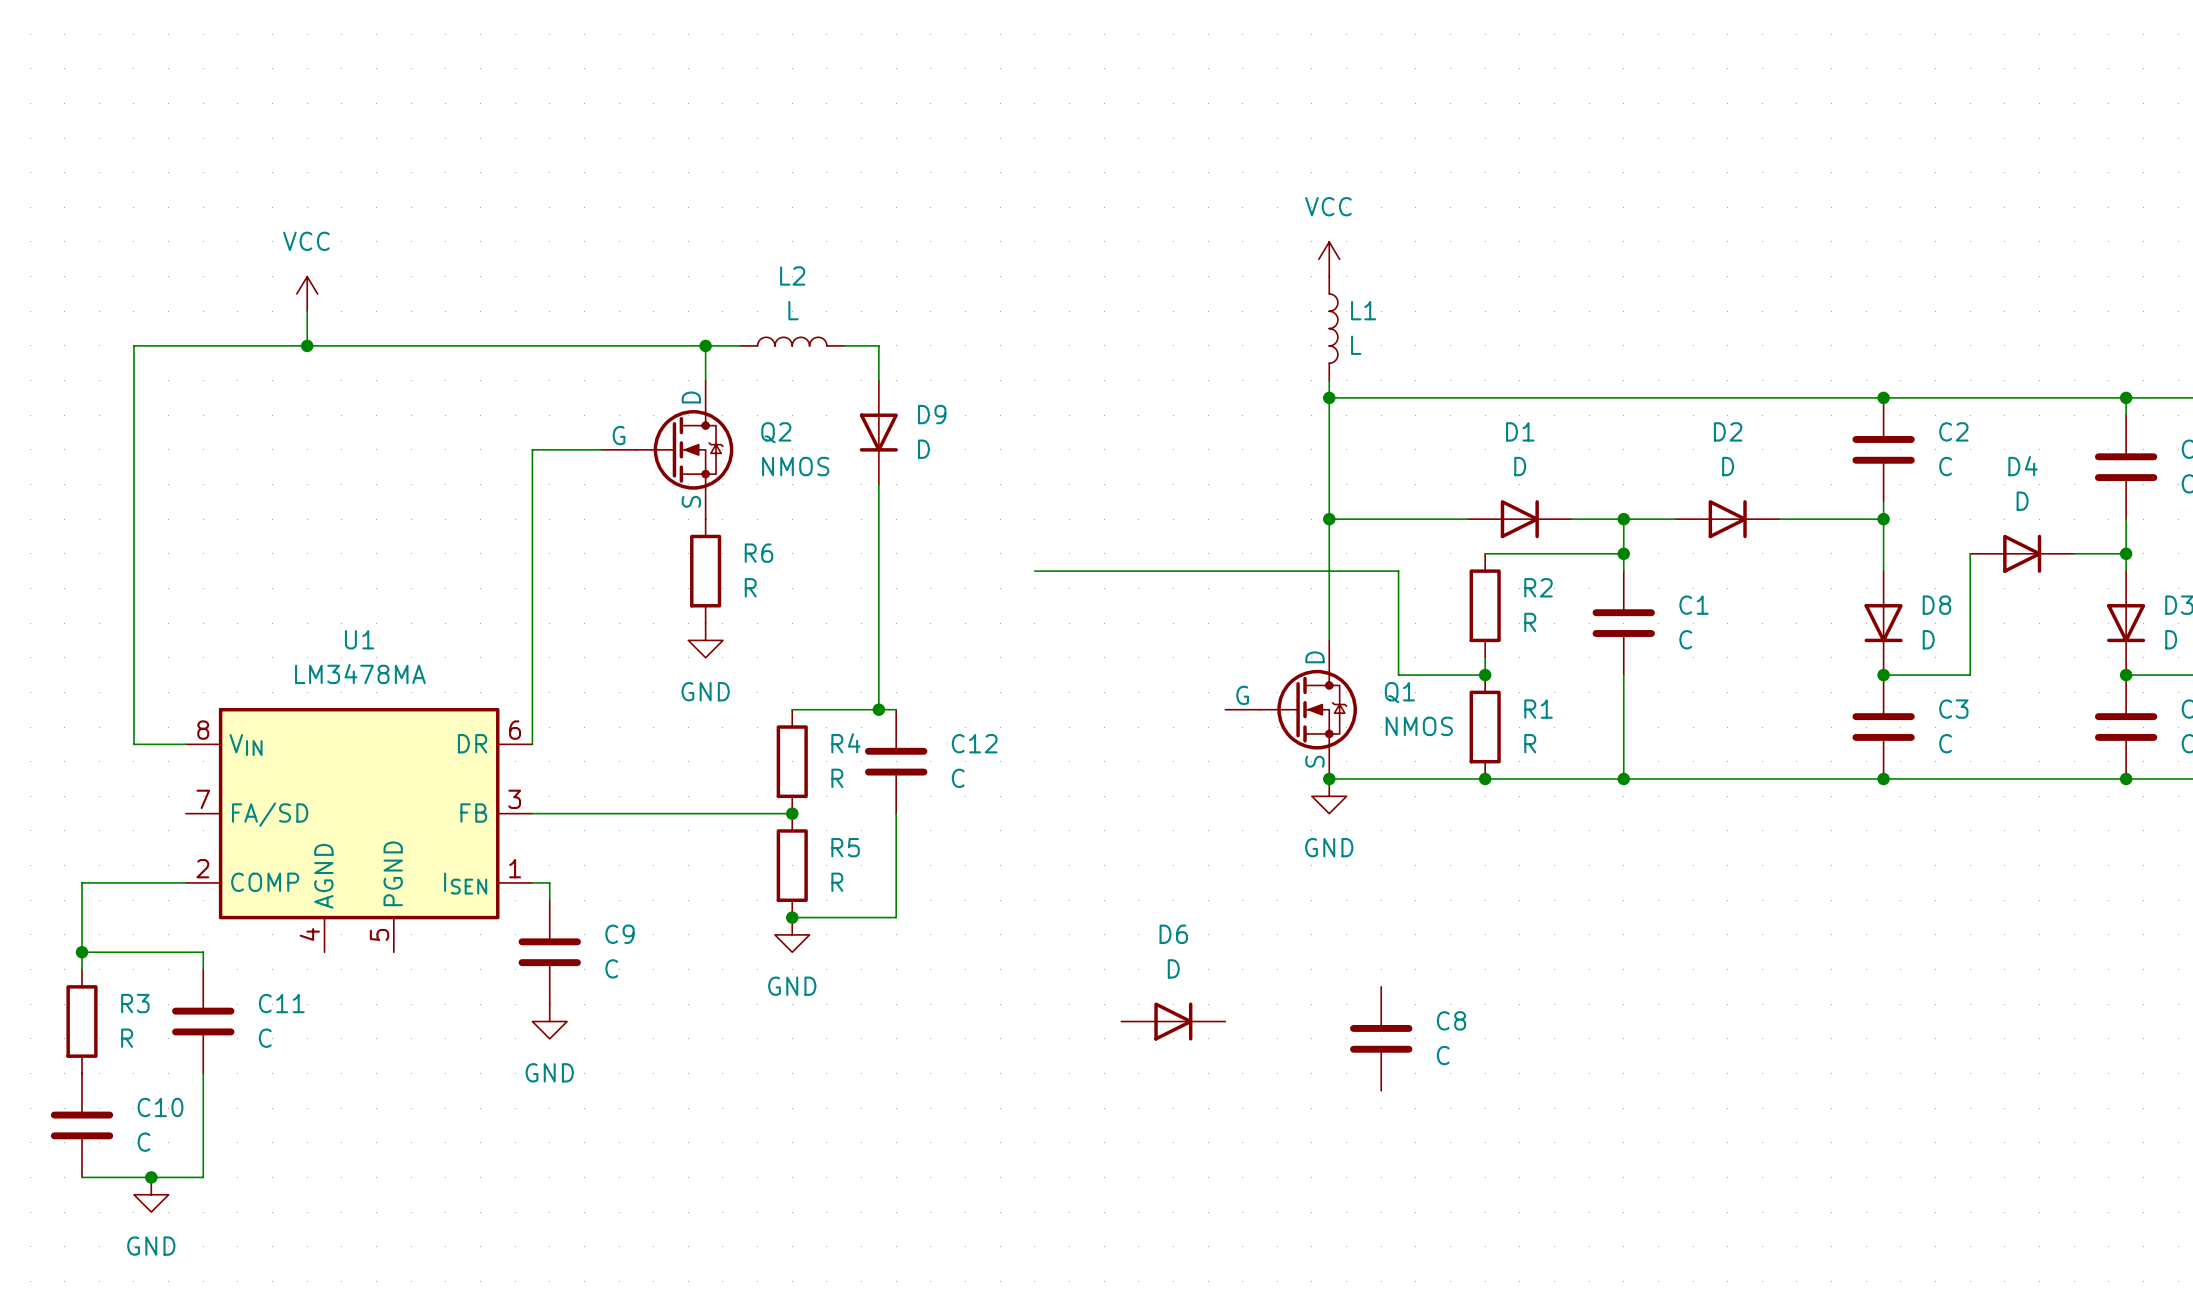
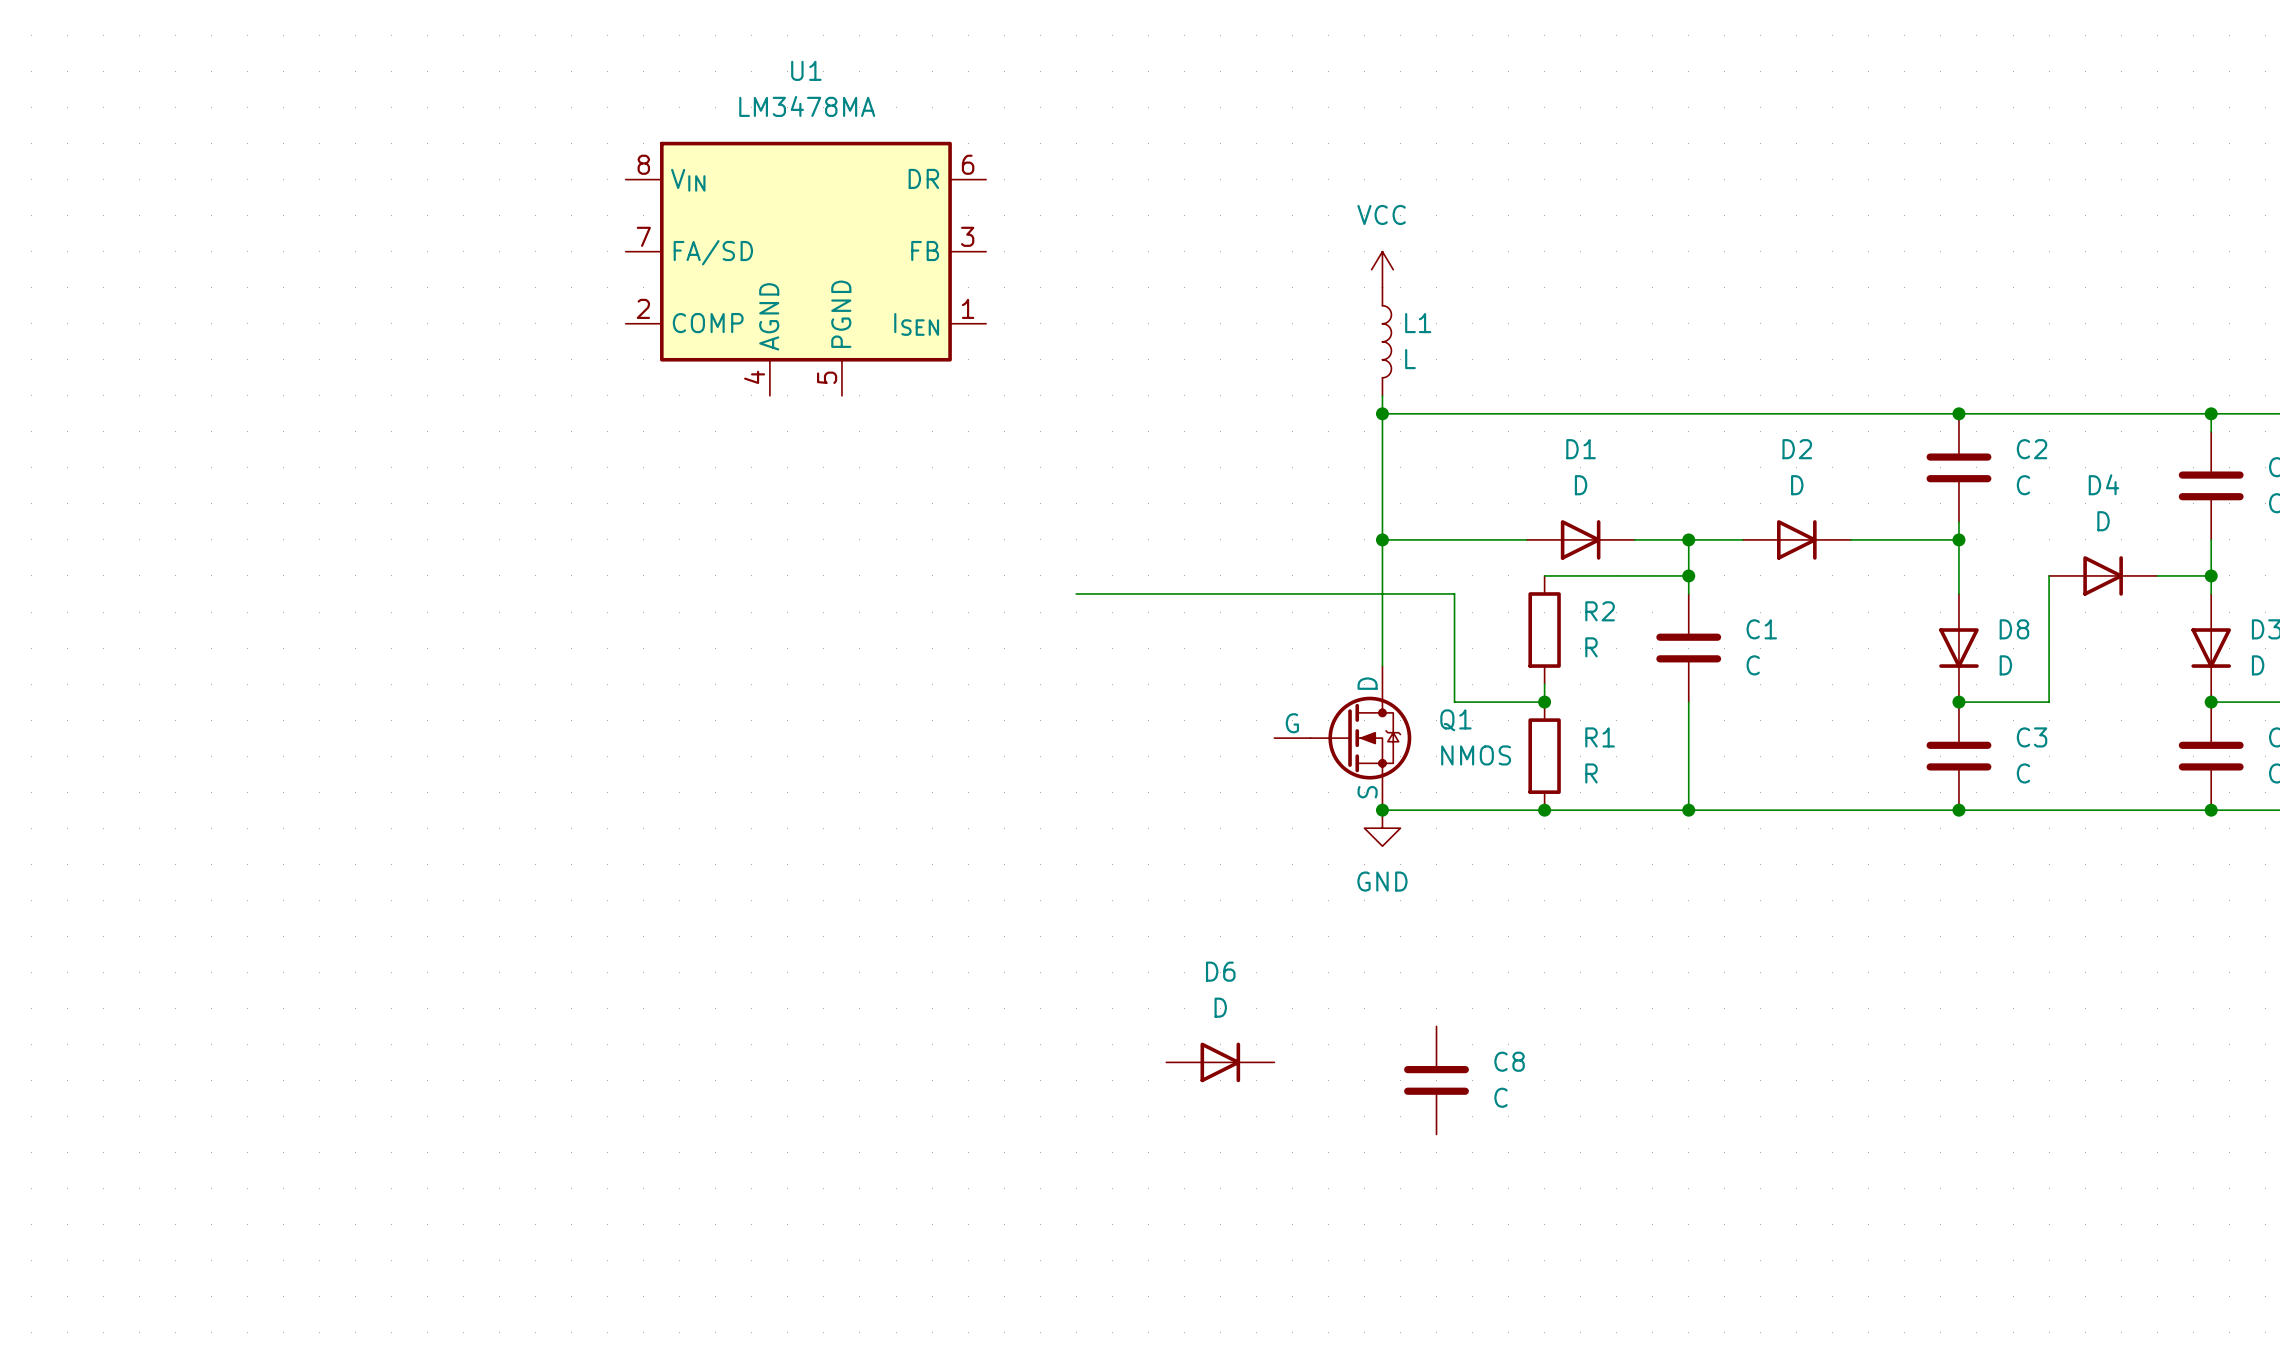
power symbol: VCC (307, 293) -> none
wire: (307, 311) (307, 345) -> none
L2: L (792, 341) -> none
junction: (307, 345) -> none
wire: (705, 345) (705, 380) -> none
junction: (705, 345) -> none
wire: (740, 345) (133, 345) (133, 744) (185, 744) -> none
wire: (844, 345) (878, 345) (878, 380) -> none
D9: D (878, 432) -> none
wire: (601, 449) (532, 449) (532, 744) -> none
Q2: NMOS (667, 449) -> none
wire: (878, 484) (878, 709) -> none
R6: R (705, 571) -> none
power symbol: GND (705, 640) -> none
wire: (792, 709) (896, 709) -> none
junction: (878, 709) -> none
R4: R (792, 761) -> none
C12: C (896, 761) -> none
wire: (532, 813) (792, 813) -> none
junction: (792, 813) -> none
wire: (896, 813) (896, 917) (792, 917) -> none
U1 position: (359, 830) -> (805, 268)
R5: R (792, 865) -> none
wire: (185, 882) (82, 882) (82, 969) -> none
wire: (532, 882) (549, 882) (549, 900) -> none
junction: (792, 917) -> none
power symbol: GND (792, 934) -> none
wire: (82, 952) (203, 952) (203, 969) -> none
junction: (82, 952) -> none
C9: C (549, 952) -> none
R3: R (82, 1021) -> none
C11: C (203, 1021) -> none
power symbol: GND (549, 1021) -> none
wire: (203, 1073) (203, 1177) (82, 1177) -> none
C10: C (82, 1125) -> none
junction: (151, 1177) -> none
power symbol: GND (151, 1194) -> none

